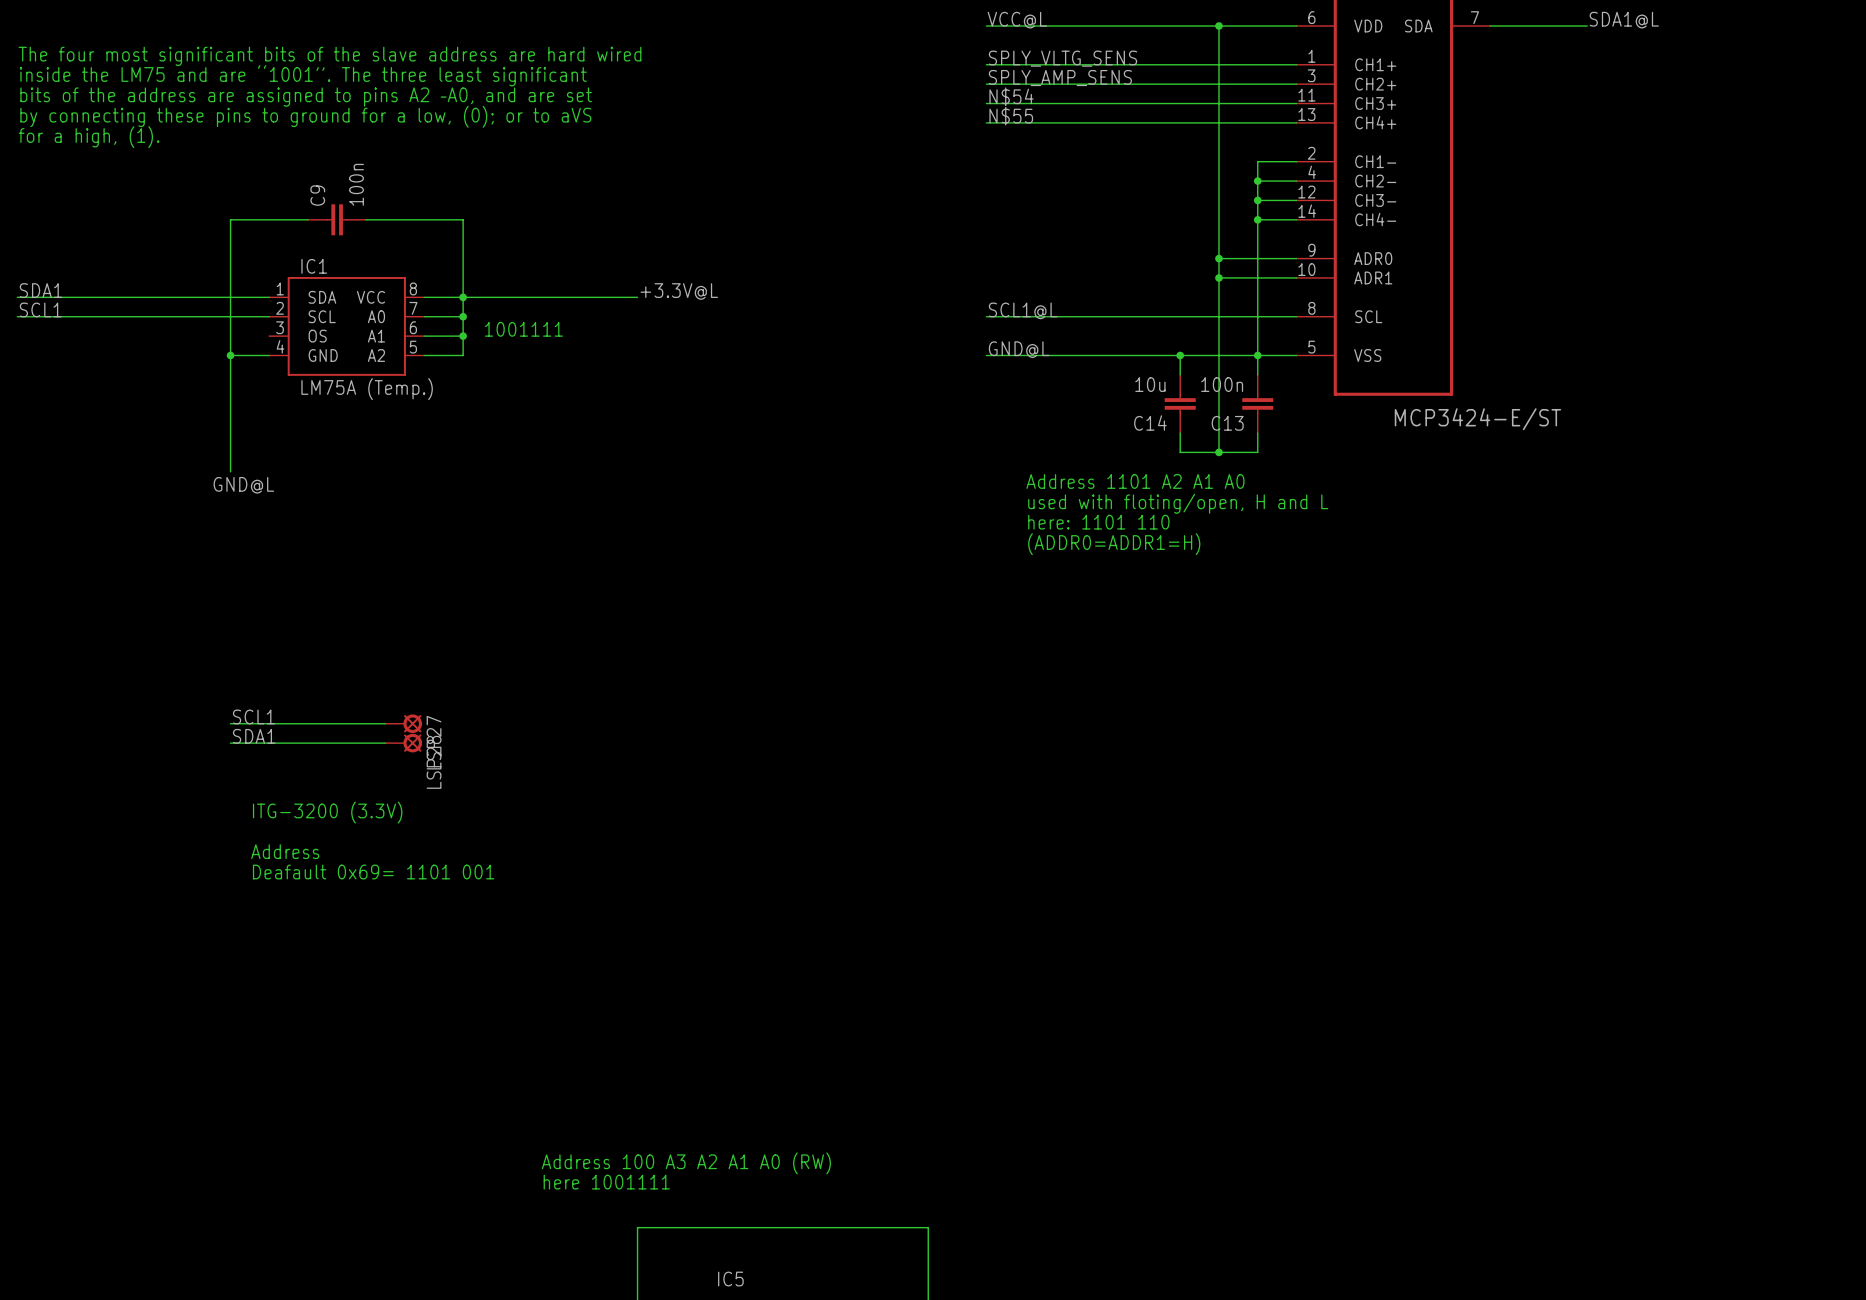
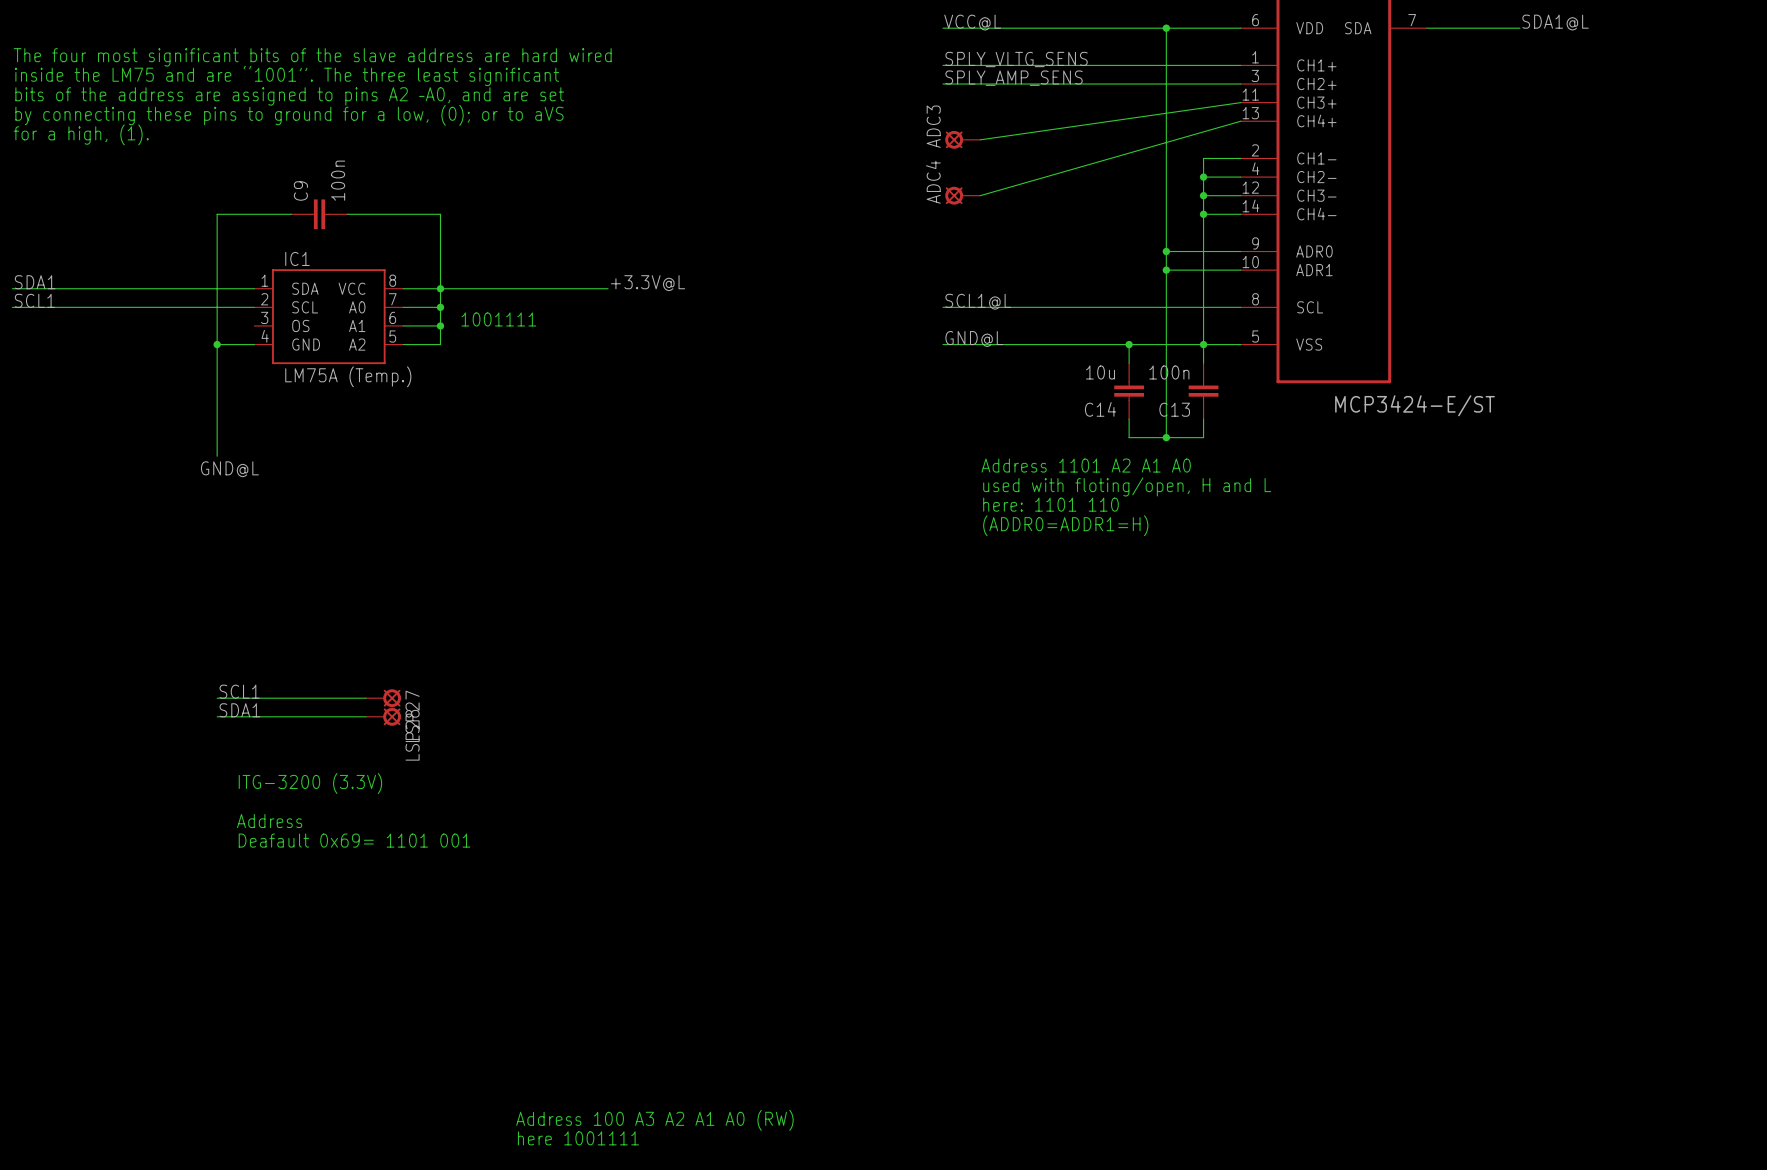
label: N$54 (1011, 96) -> none
wire: (986, 103) (1296, 103) -> (980, 139) (1240, 102)
label: N$55 (1011, 116) -> none
wire: (986, 122) (1296, 122) -> (980, 195) (1240, 121)
ADC3: none -> (962, 139)
ADC4: none -> (962, 195)

